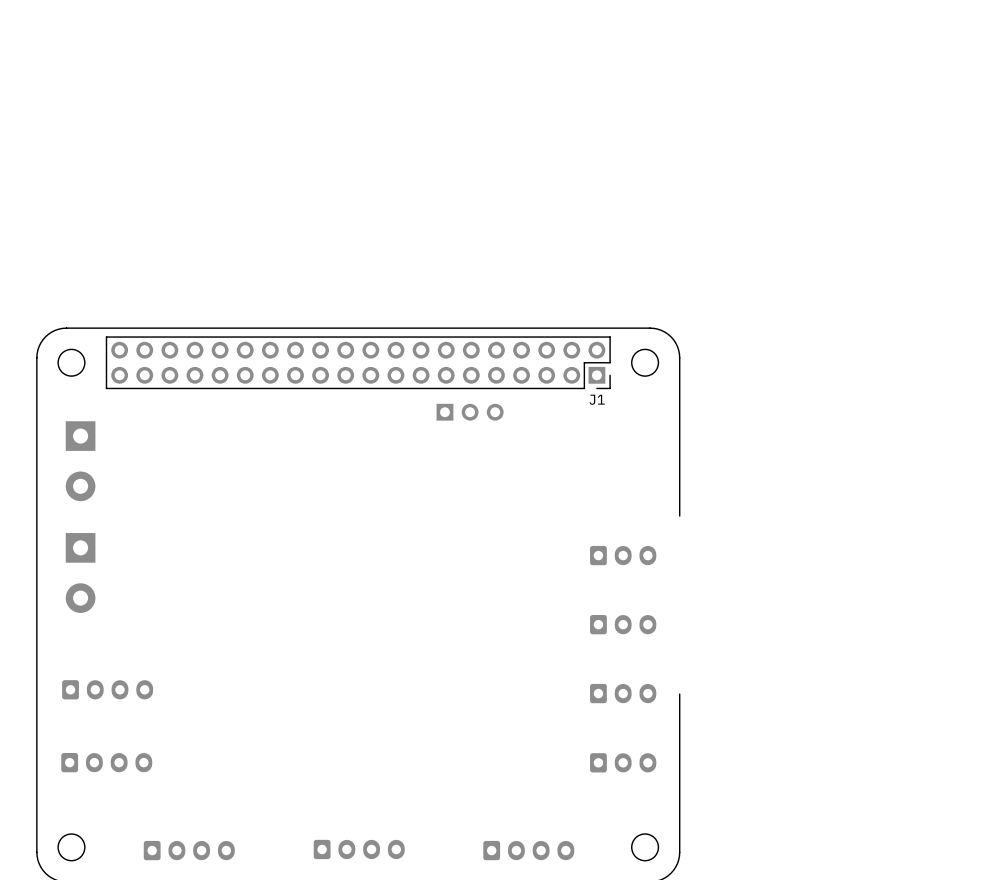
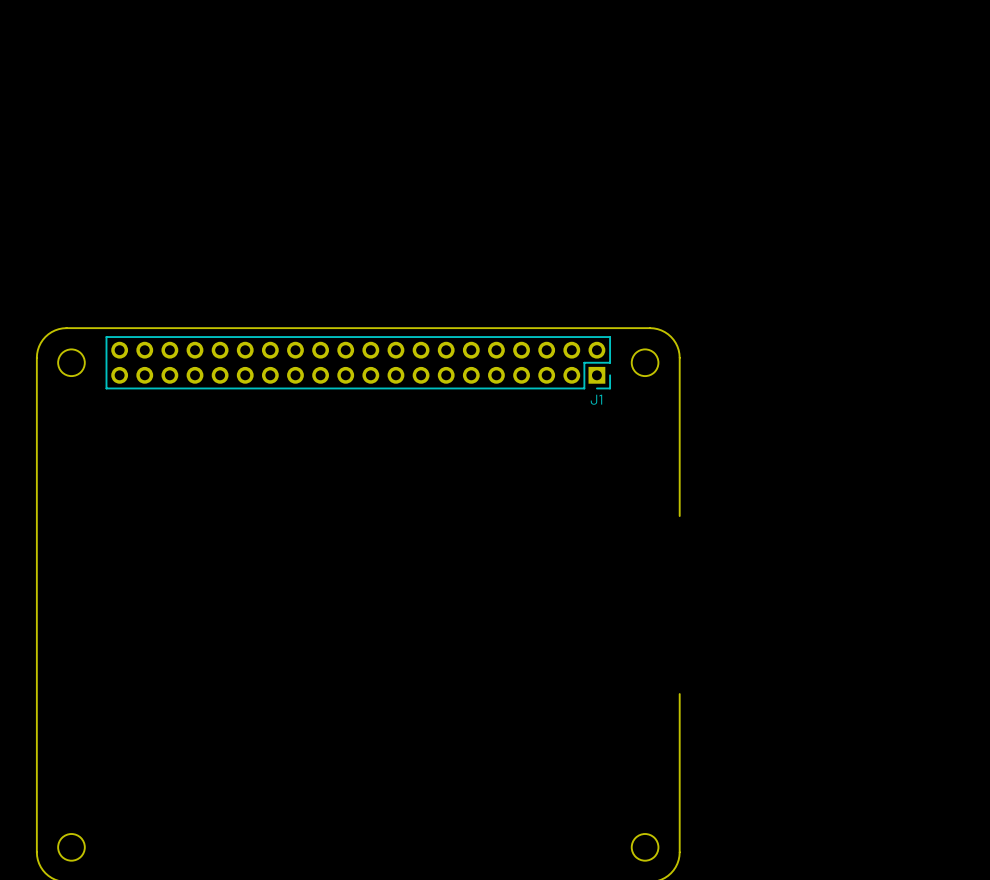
part: (470, 412) -> none
part: (80, 461) -> none
part: (623, 555) -> none
part: (80, 572) -> none
part: (623, 624) -> none
part: (107, 689) -> none
part: (623, 693) -> none
part: (106, 762) -> none
part: (623, 762) -> none
part: (359, 849) -> none
part: (189, 850) -> none
part: (528, 850) -> none

